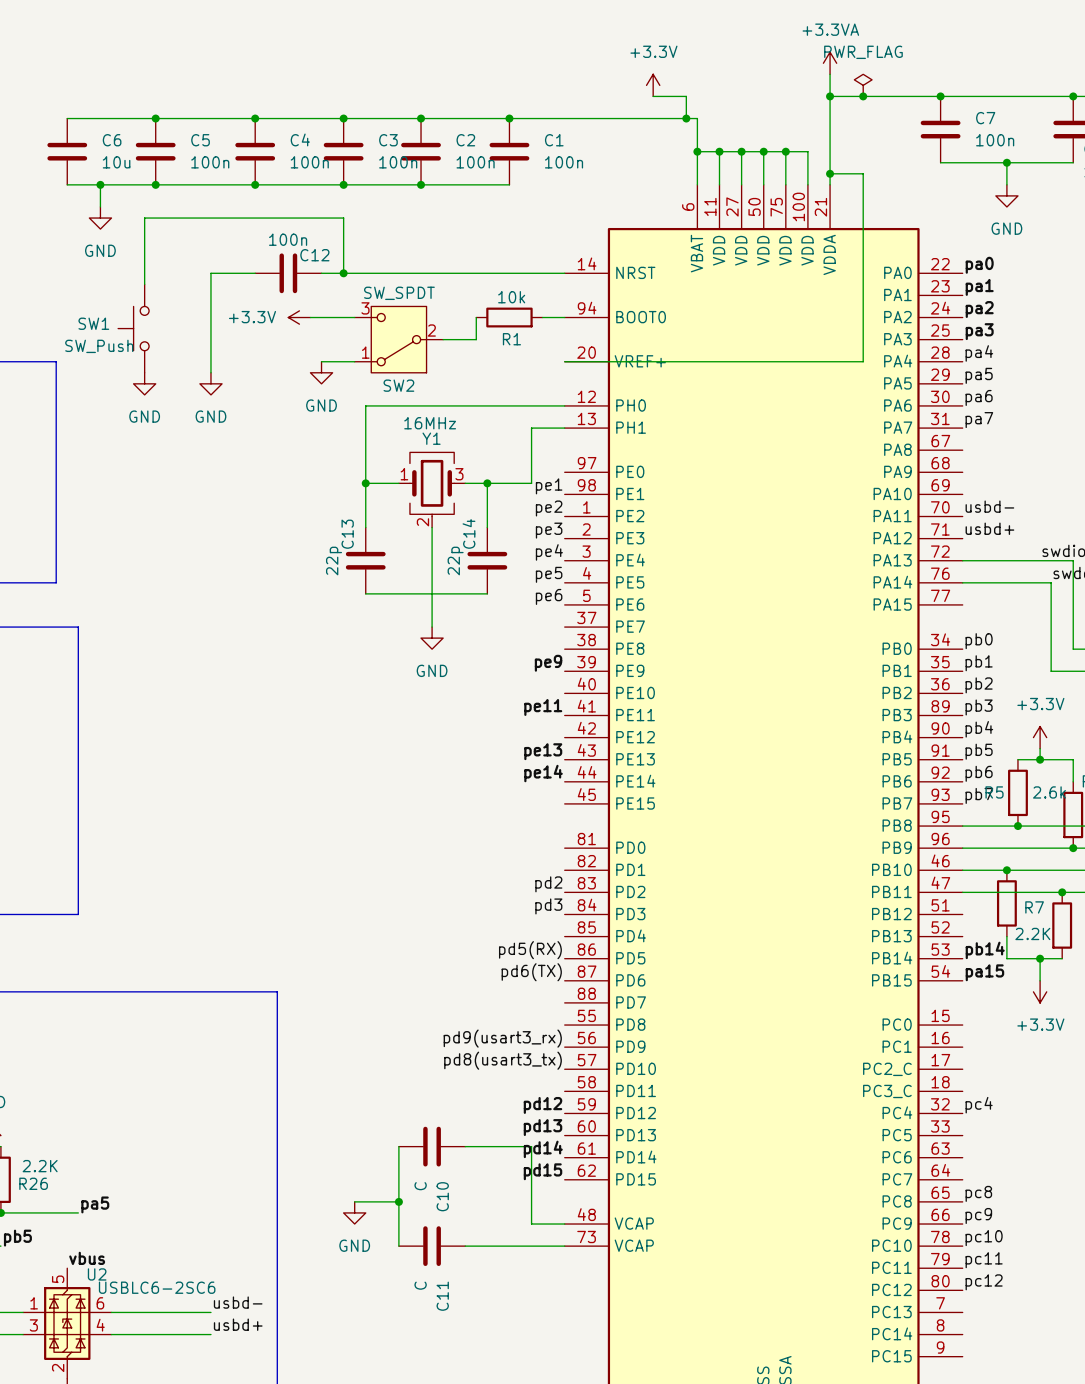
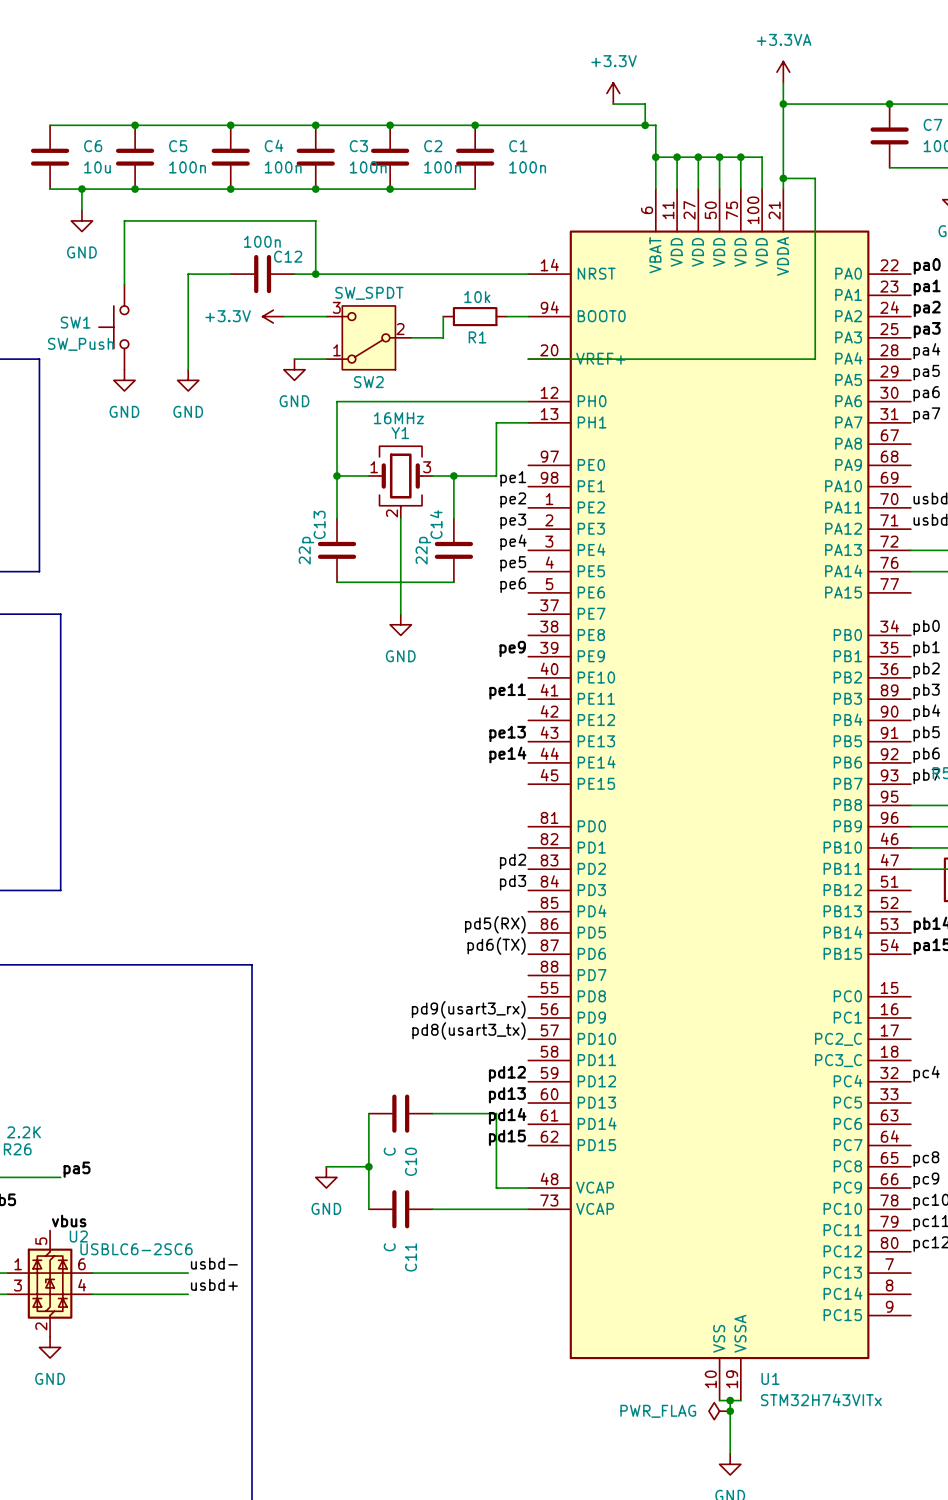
power symbol: PWR_FLAG (863, 85) -> none
junction: (863, 96) -> none

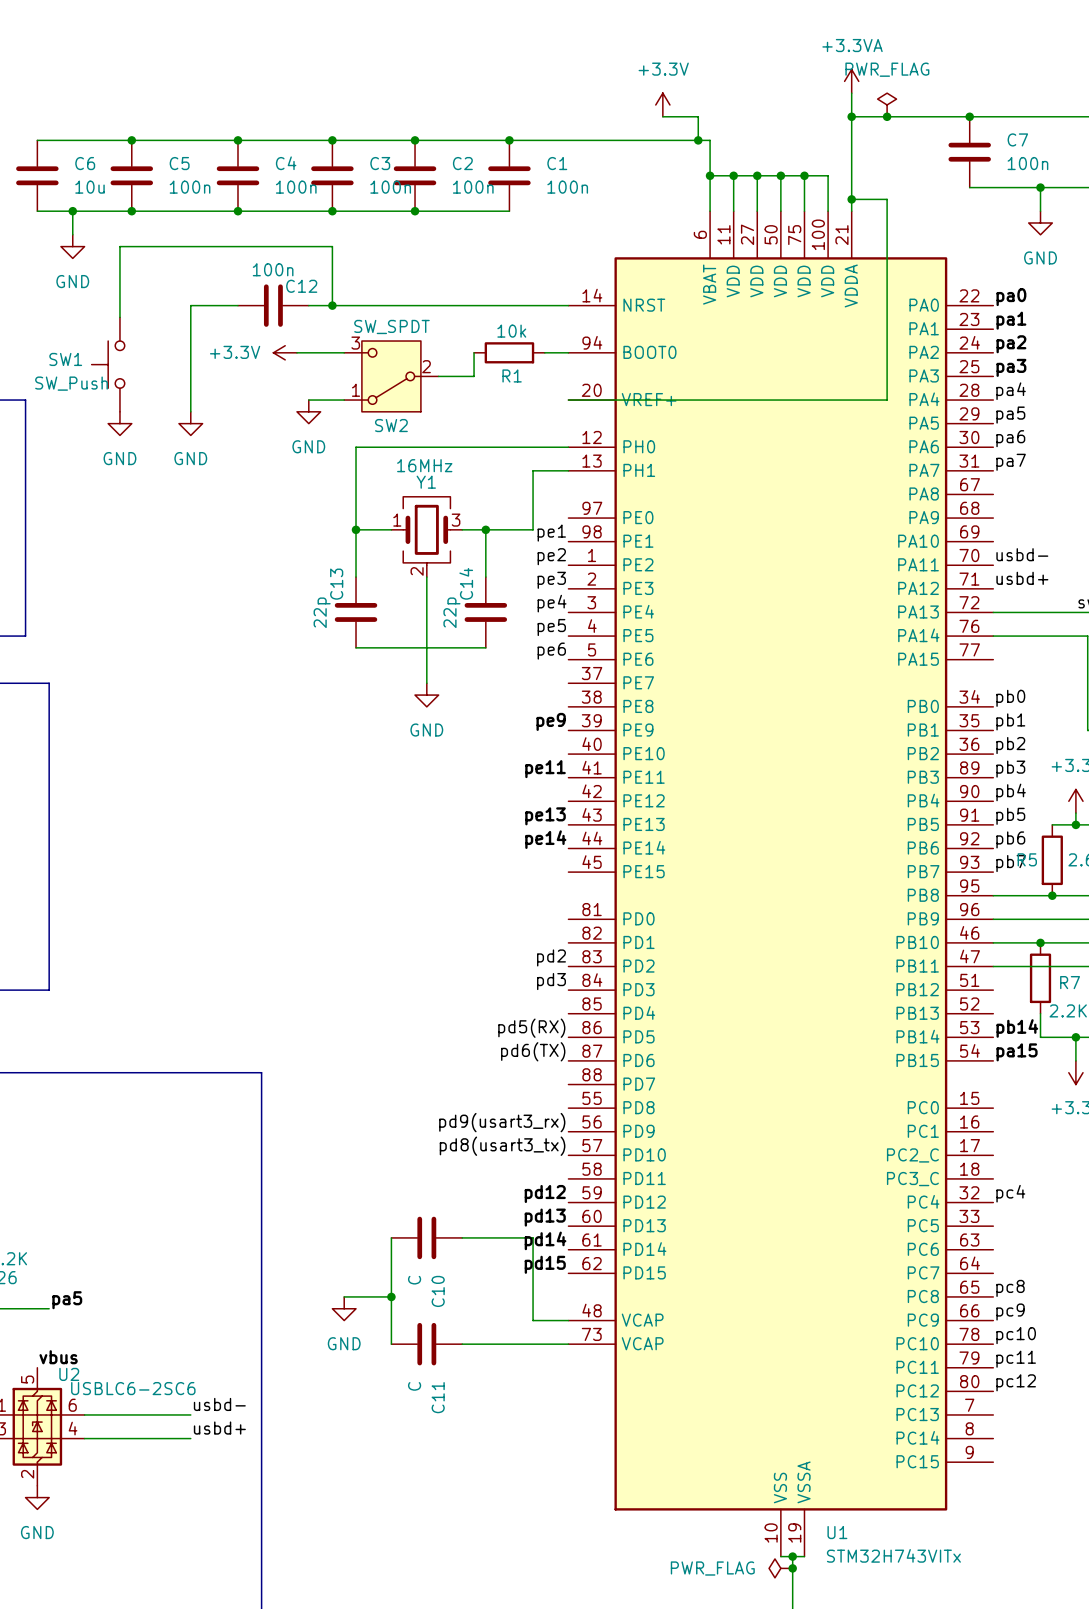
power symbol: none -> PWR_FLAG (887, 104)
junction: none -> (887, 116)

